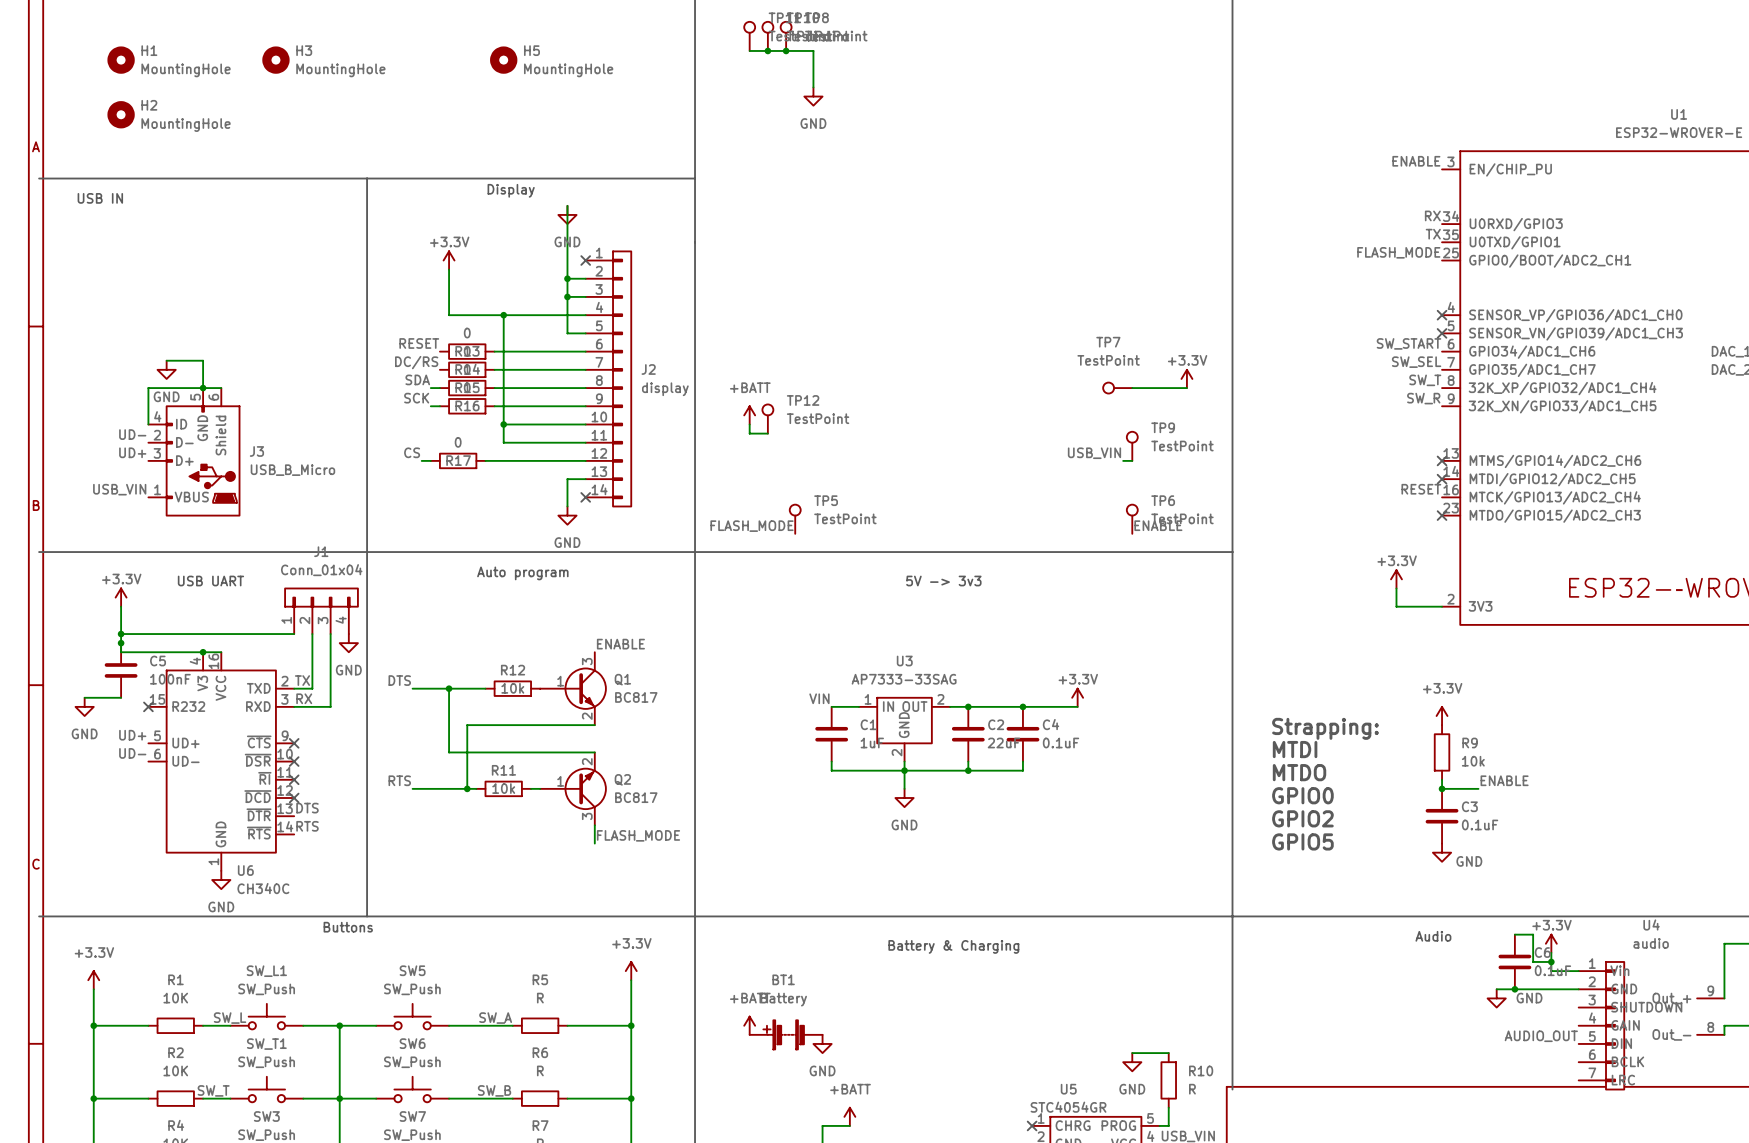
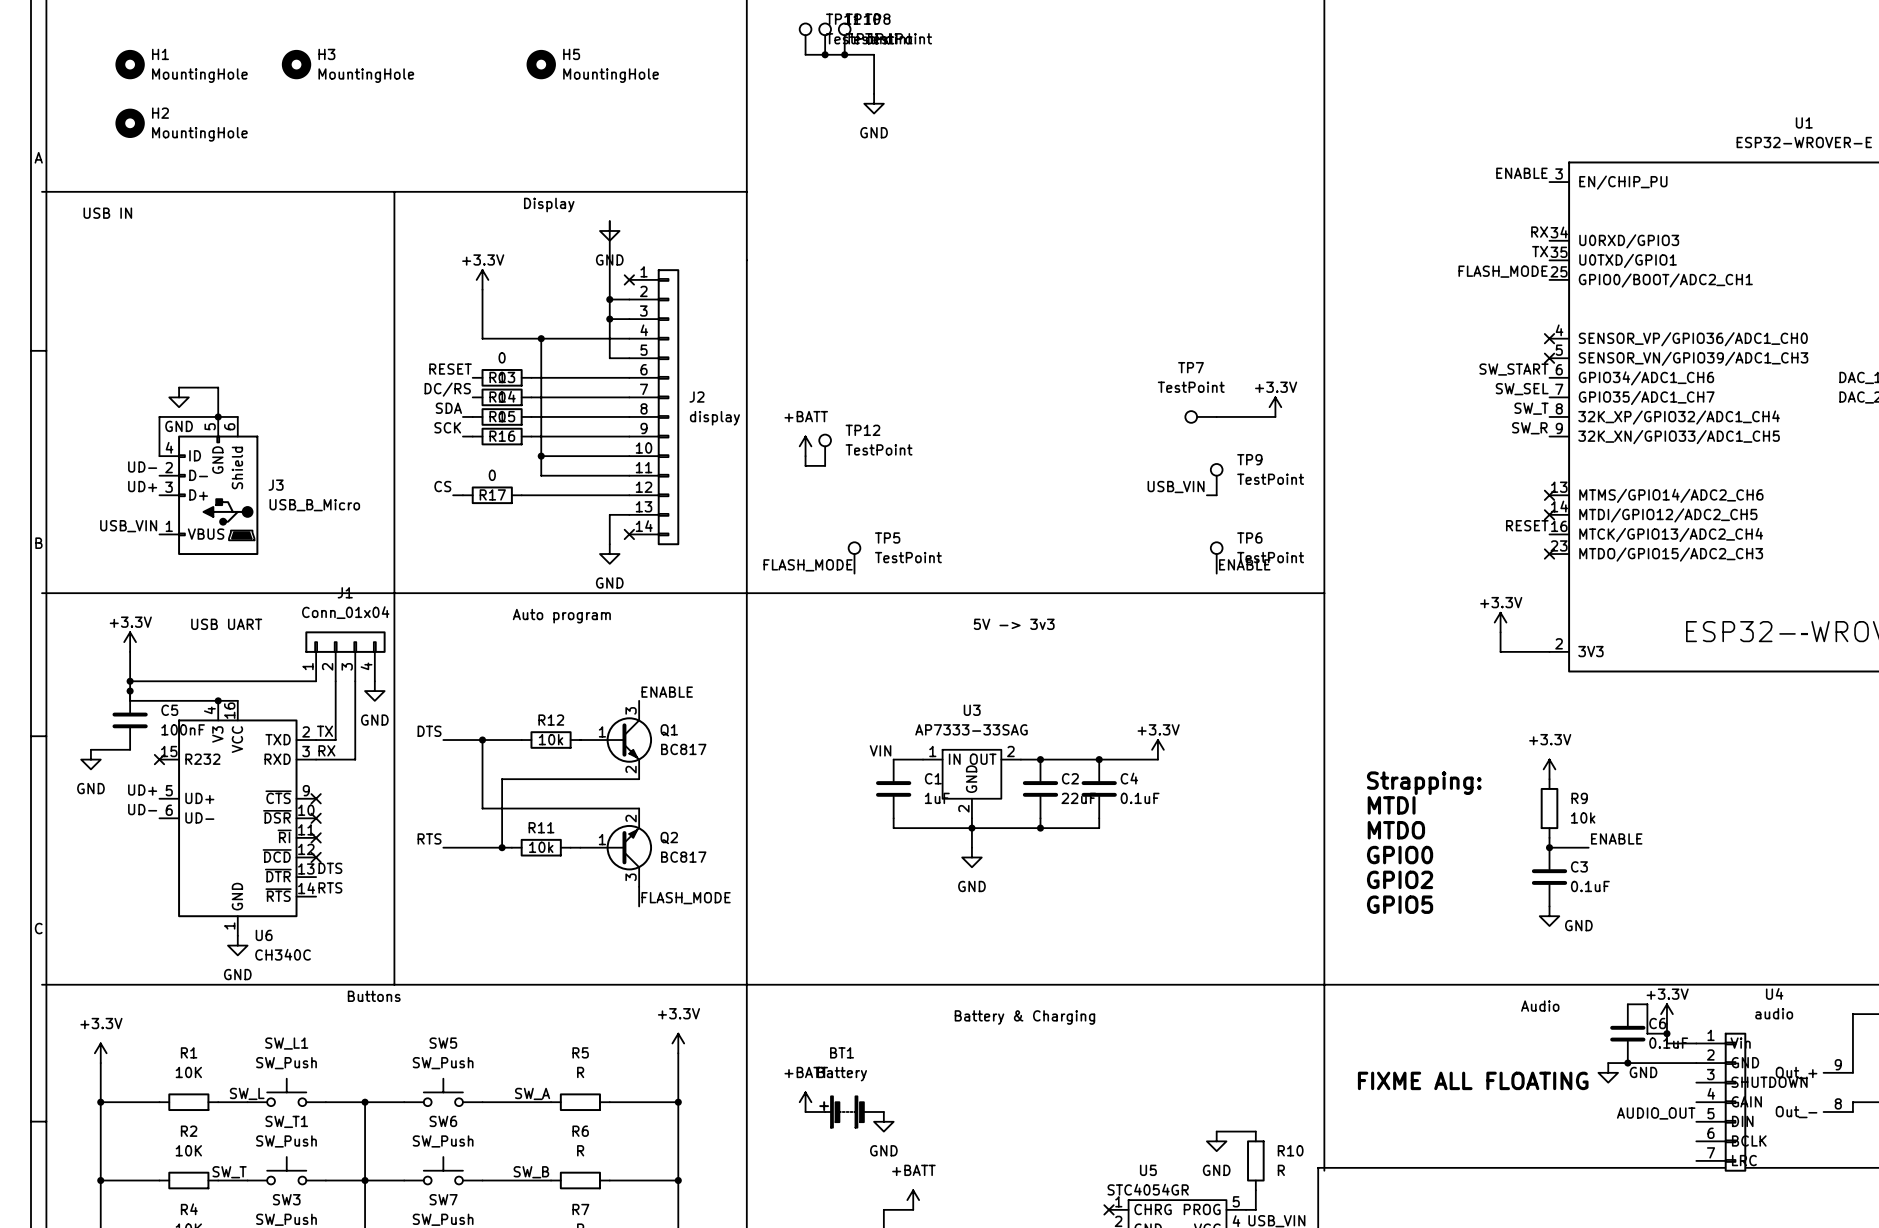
text: none -> FIXME ALL FLOATING (1473, 1080)

